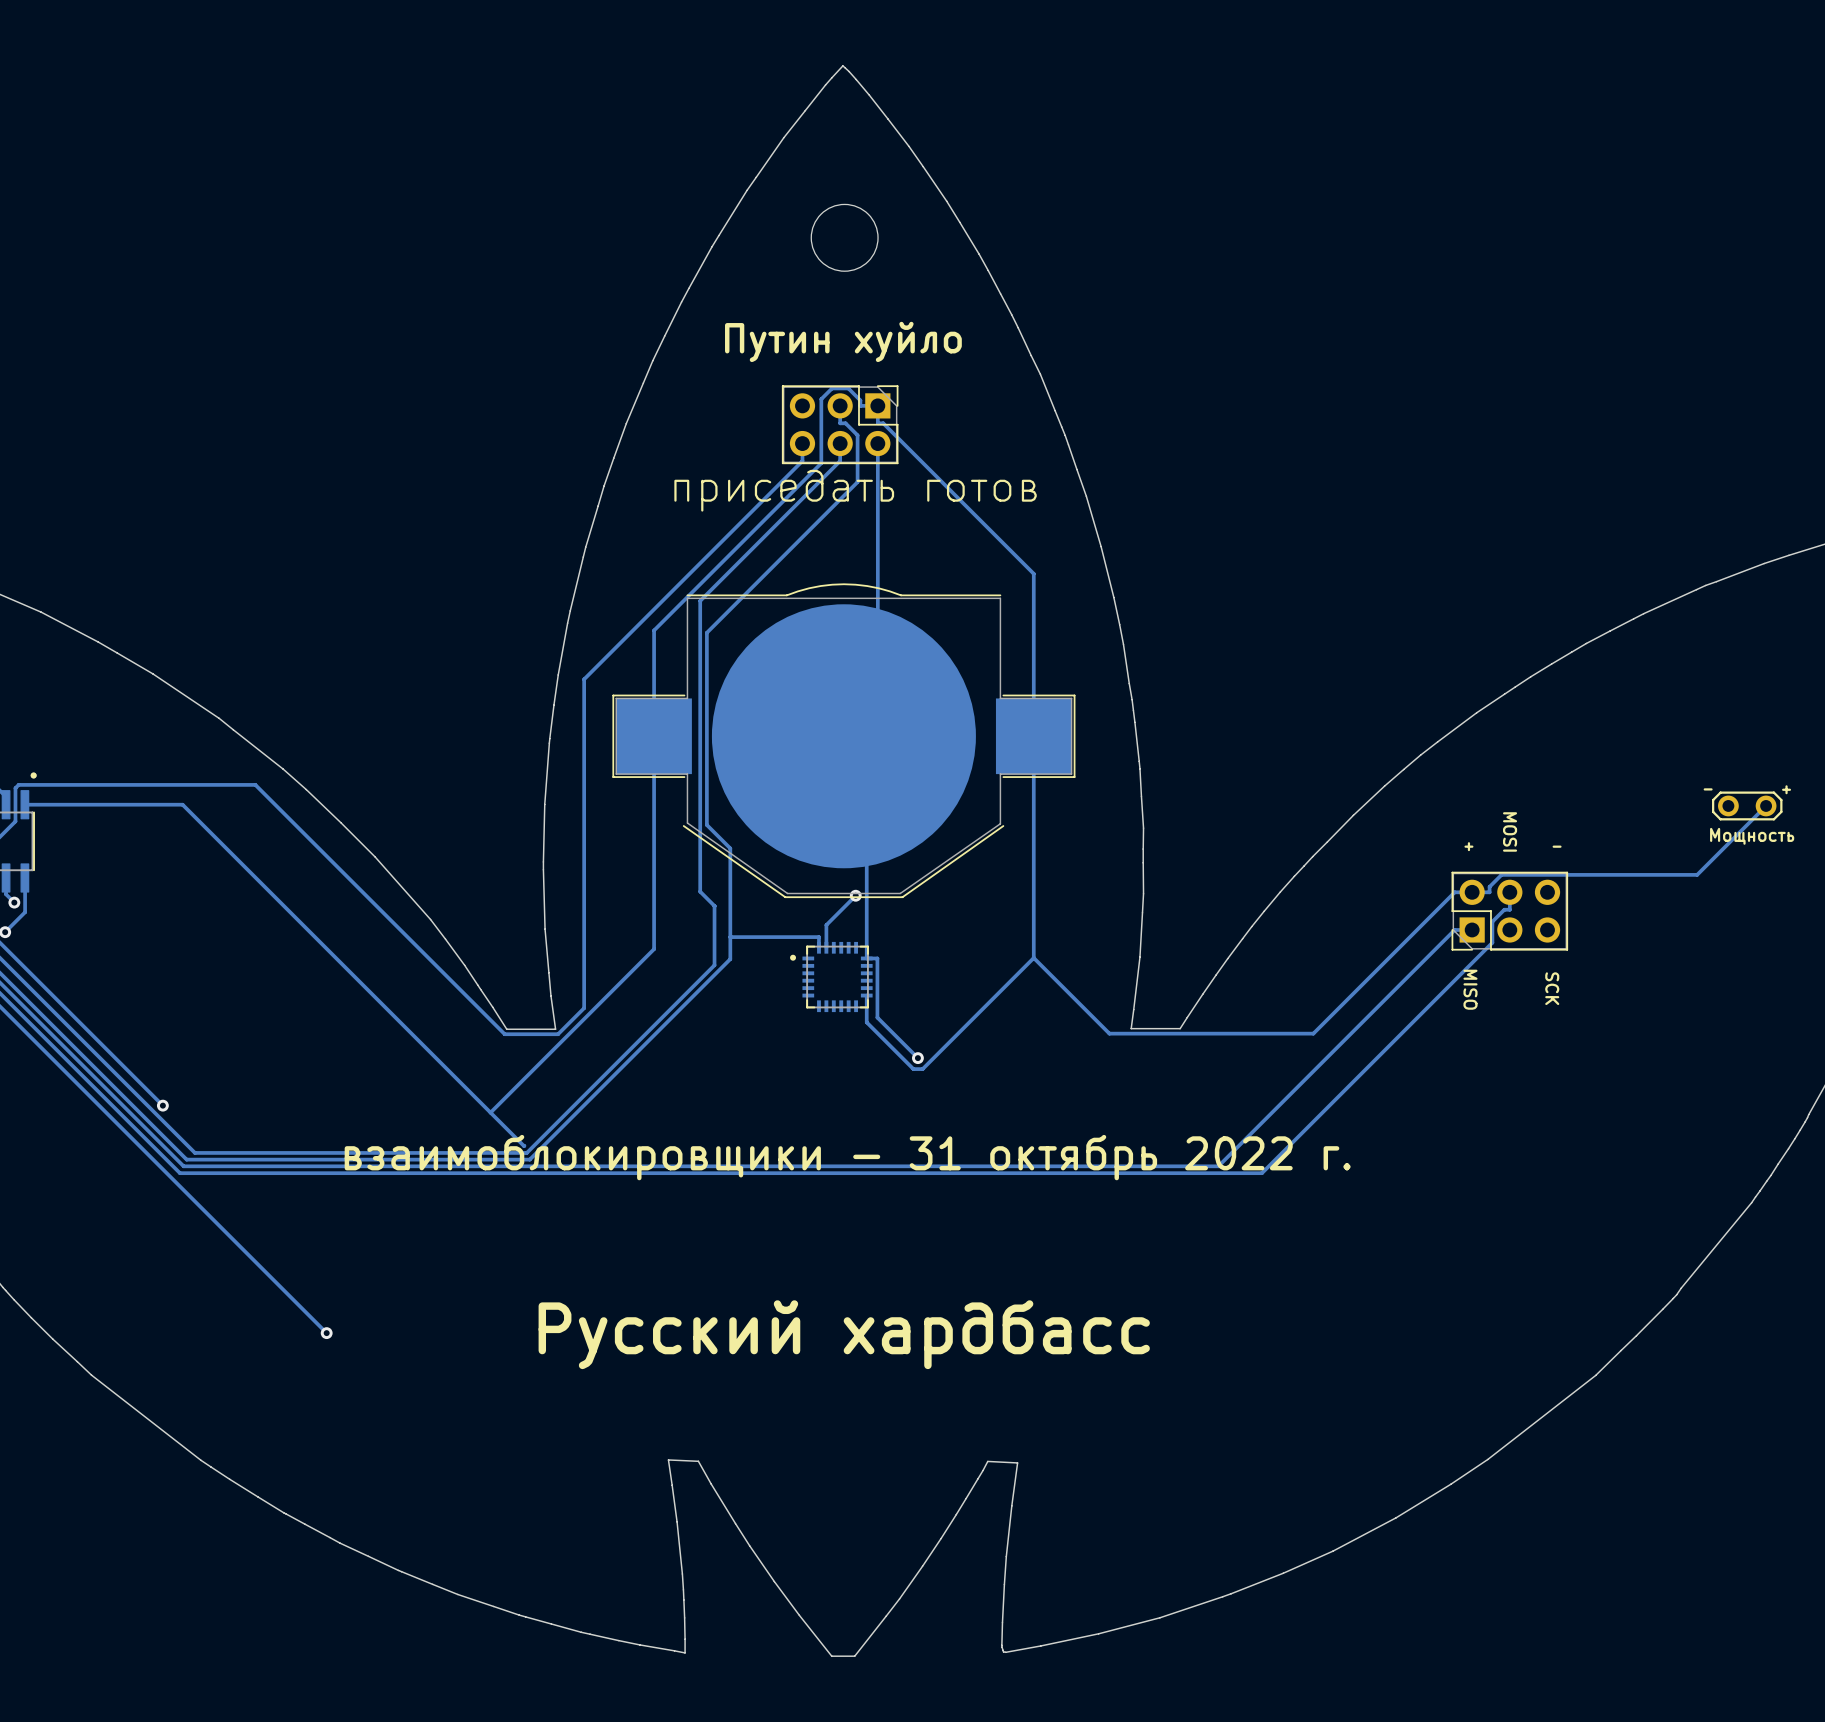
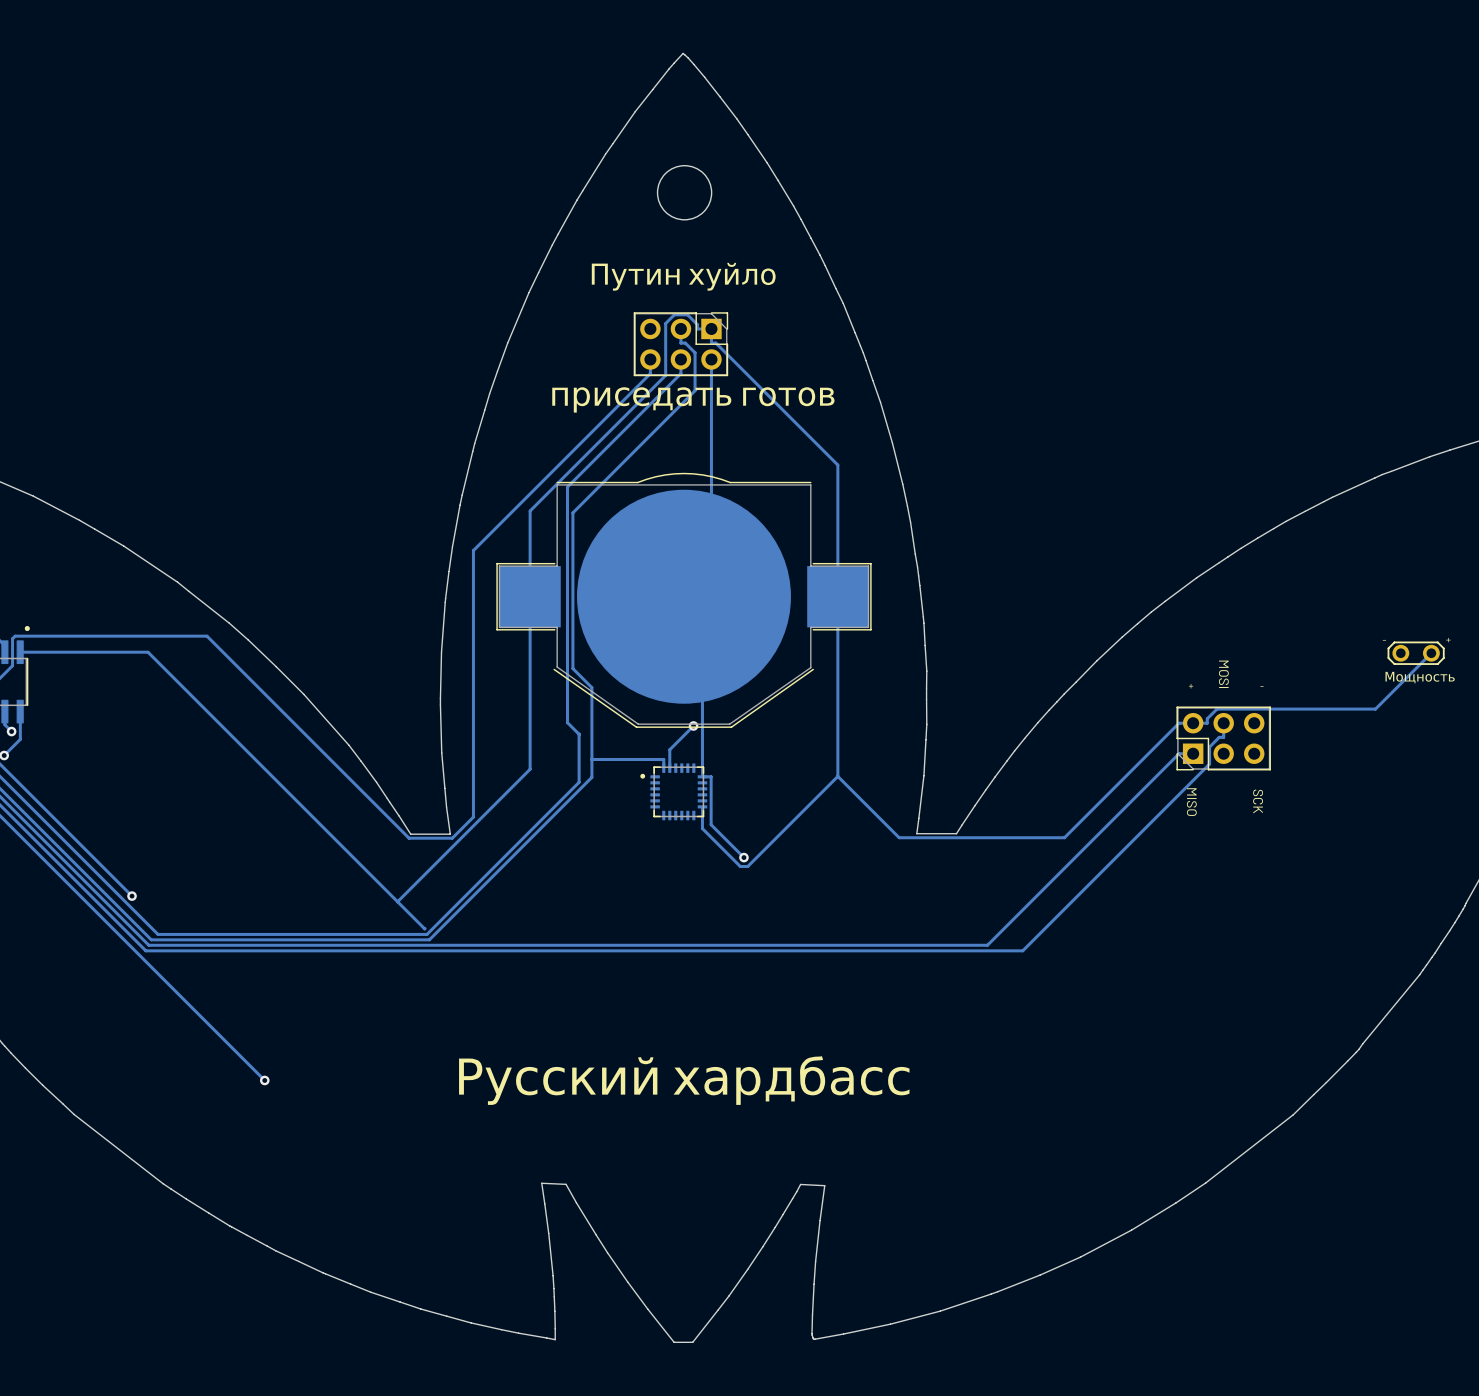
text: взаимоблокировщики - 31 октябрь 2022 г. (847, 1157) -> none

